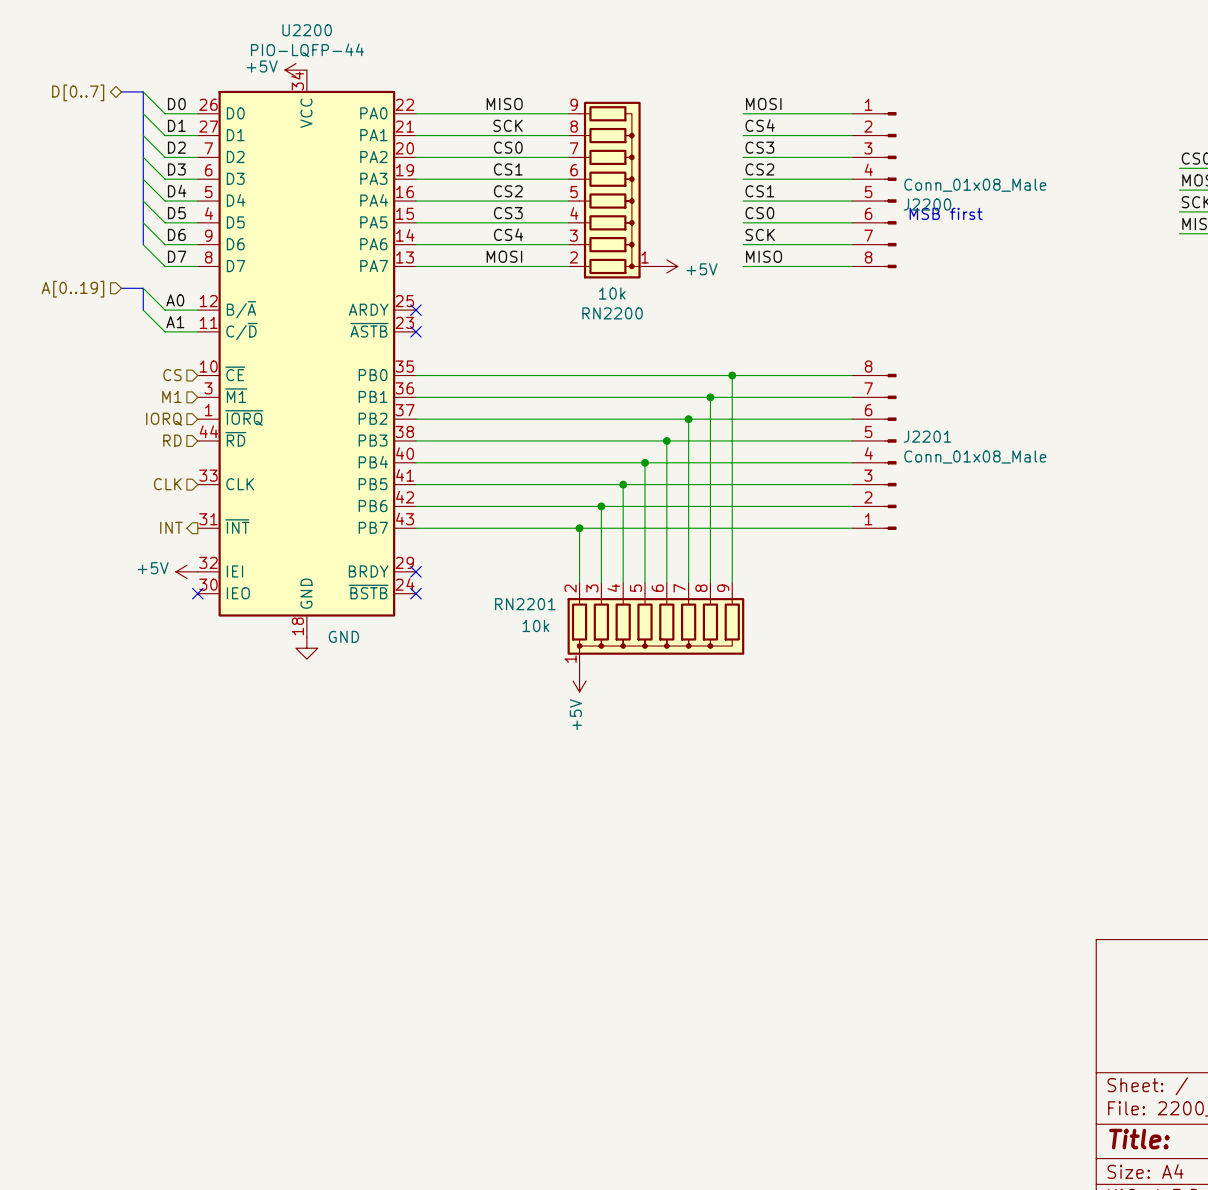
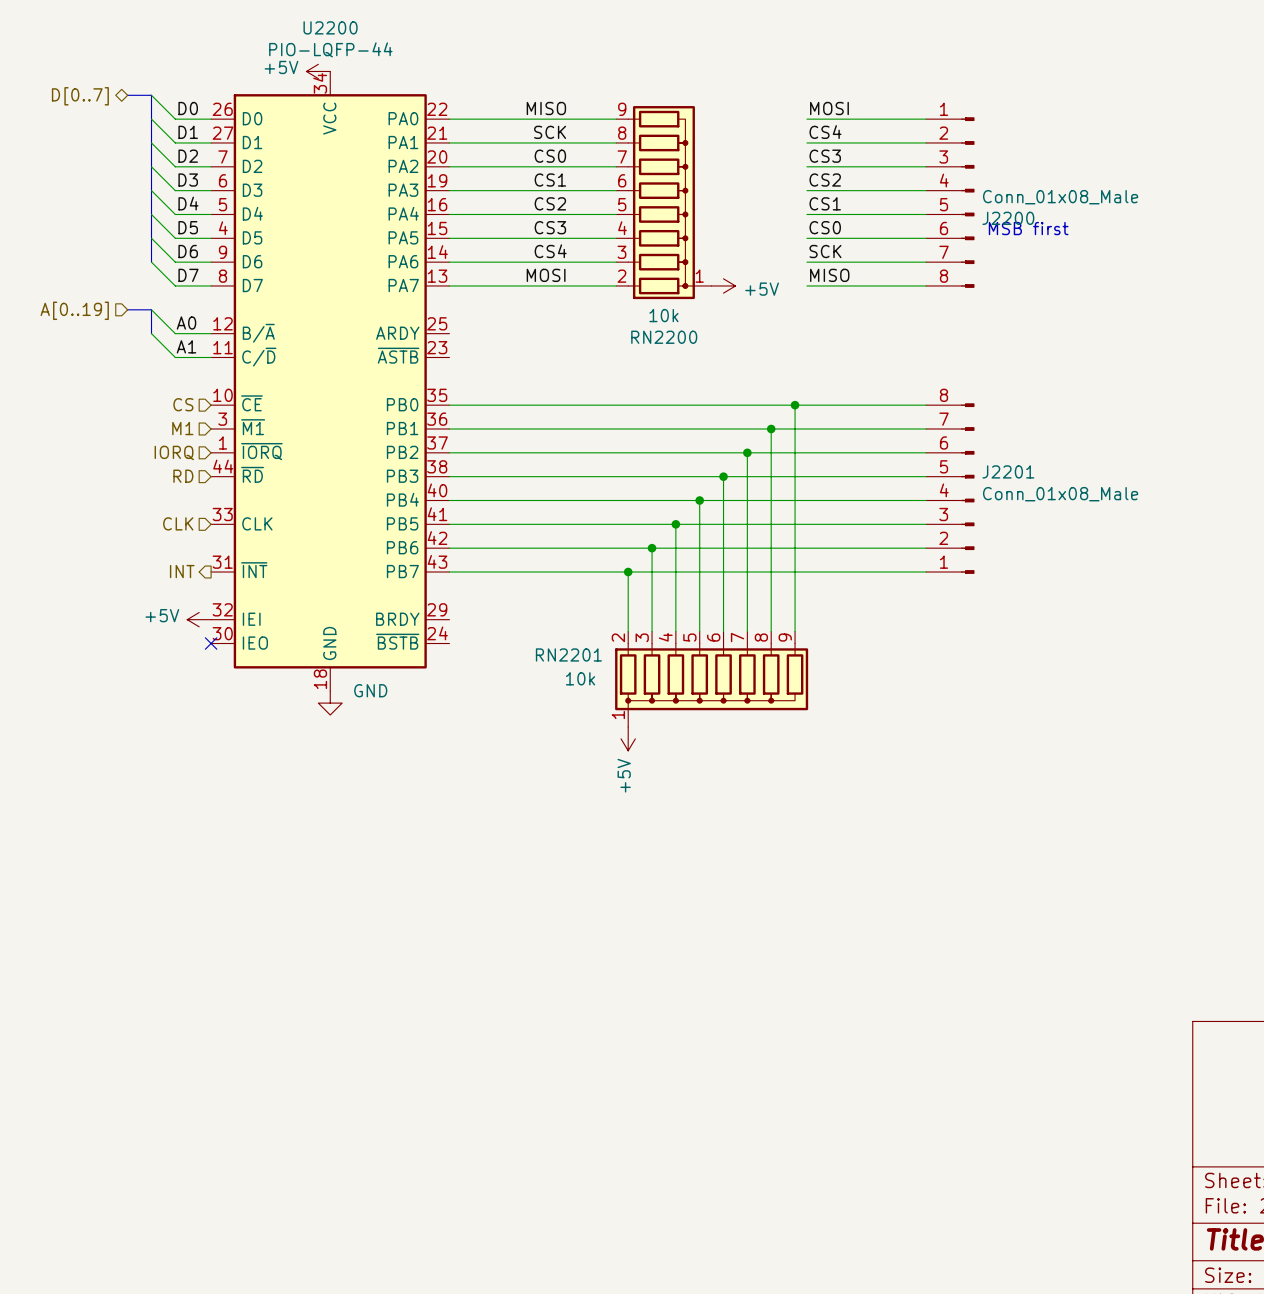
no-connect mark: (415, 310) -> none
no-connect mark: (415, 331) -> none
no-connect mark: (415, 571) -> none
no-connect mark: (415, 593) -> none

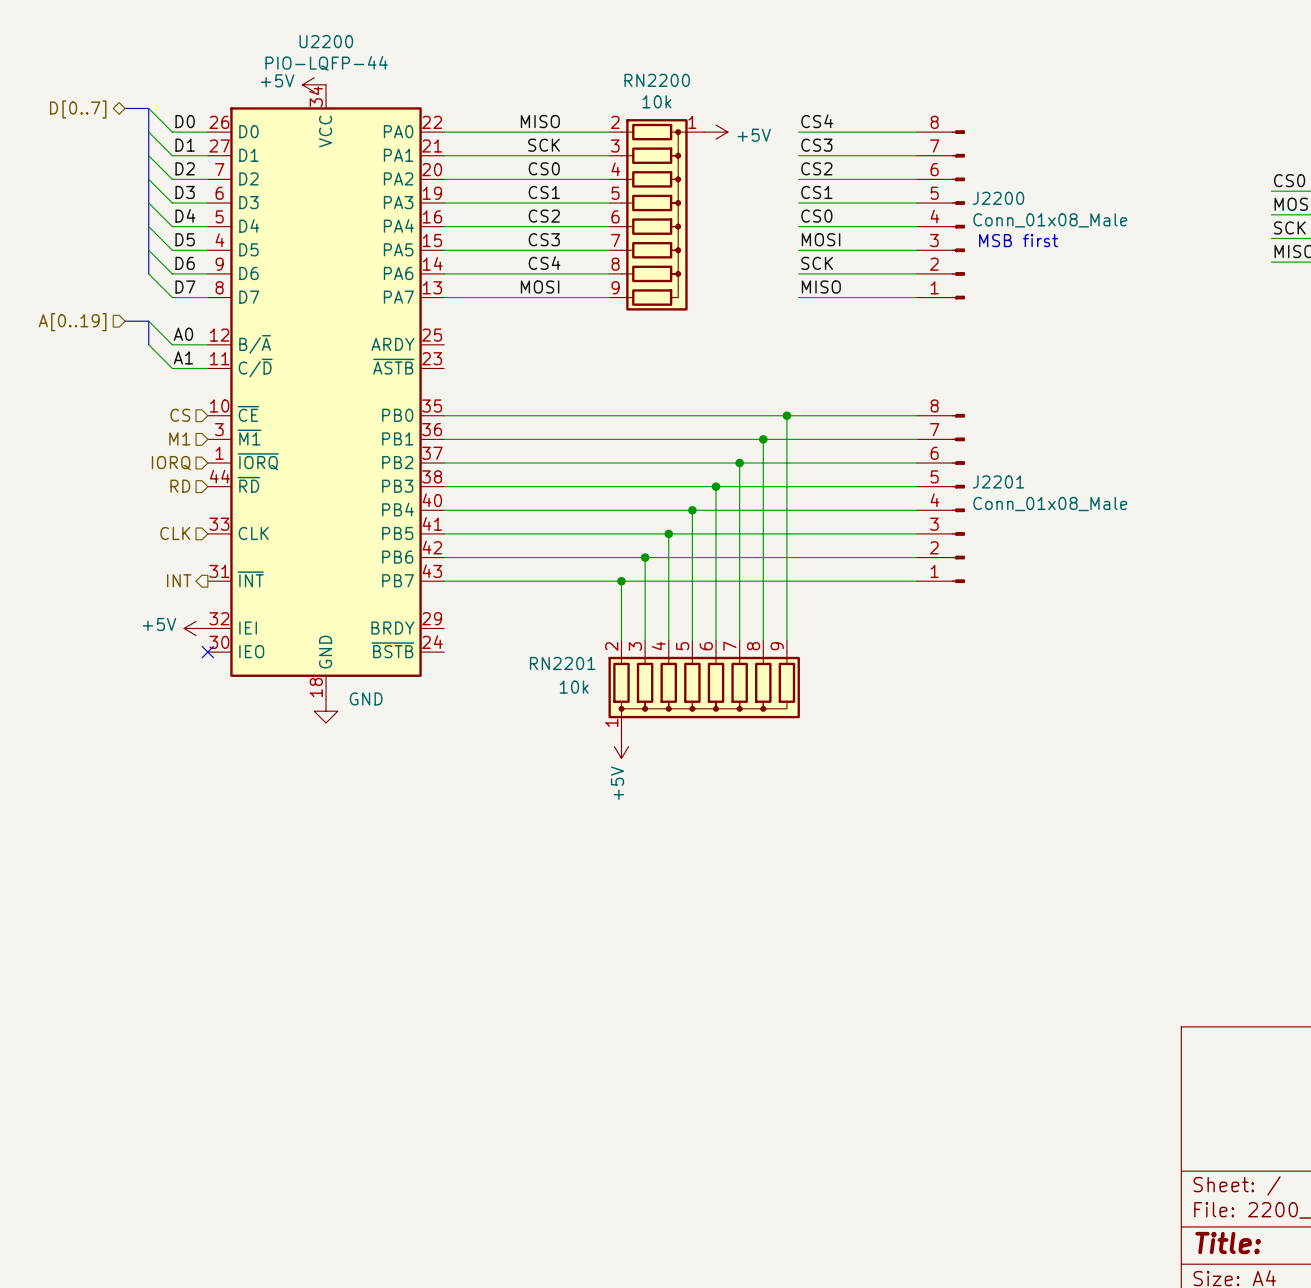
label: MOSI (829, 108) -> CS4 (817, 121)
label: CS4 (825, 132) -> CS3 (816, 145)
label: CS3 (825, 156) -> CS2 (816, 168)
label: CS2 (825, 180) -> CS1 (816, 192)
RN2200 flip: as is (661, 202) -> up-down (654, 214)
J2200 flip: as is (967, 202) -> up-down (958, 214)
label: CS1 (825, 203) -> CS0 (816, 216)
label: CS0 (825, 227) -> MOSI (821, 239)
power symbol position: +5V (723, 285) -> +5V (716, 132)

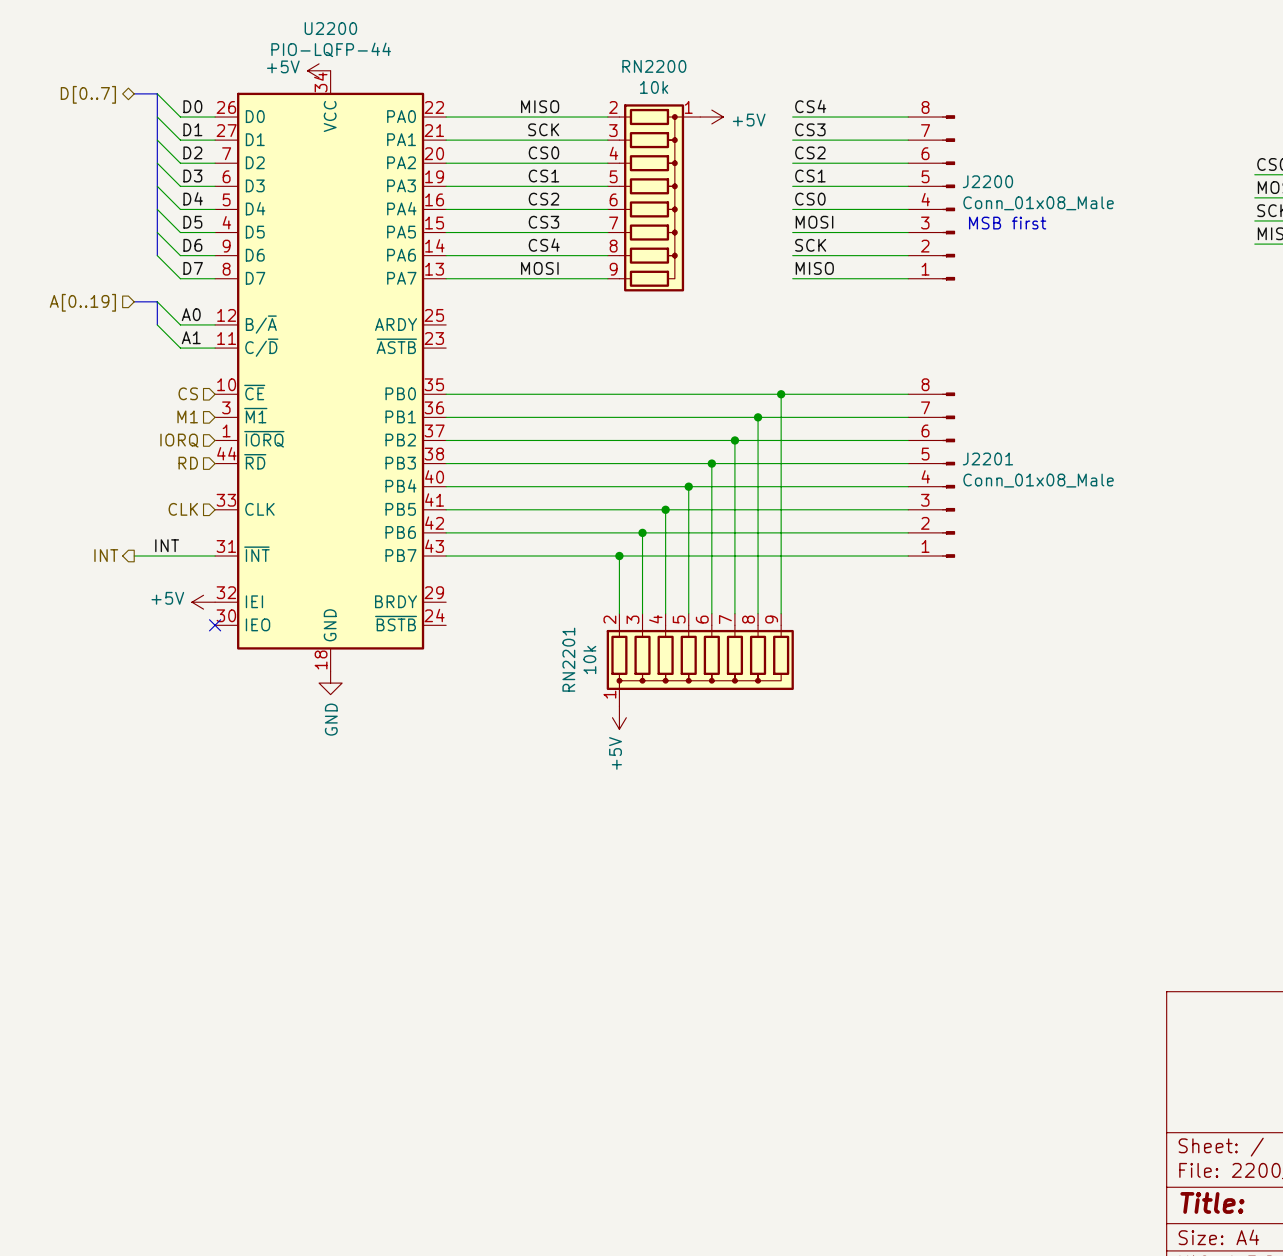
label: none -> INT (167, 545)
hierarchical label position: INT (179, 580) -> INT (106, 555)
wire: none -> (134, 556) (215, 556)
RN2201 name rotation: 0° (562, 663) -> 90° counterclockwise (568, 659)
RN2201 value rotation: 0° (574, 687) -> 90° counterclockwise (589, 659)
power symbol text rotation: 0° (366, 698) -> 90° counterclockwise (331, 719)
power symbol text position: GND (366, 698) -> GND (331, 719)

